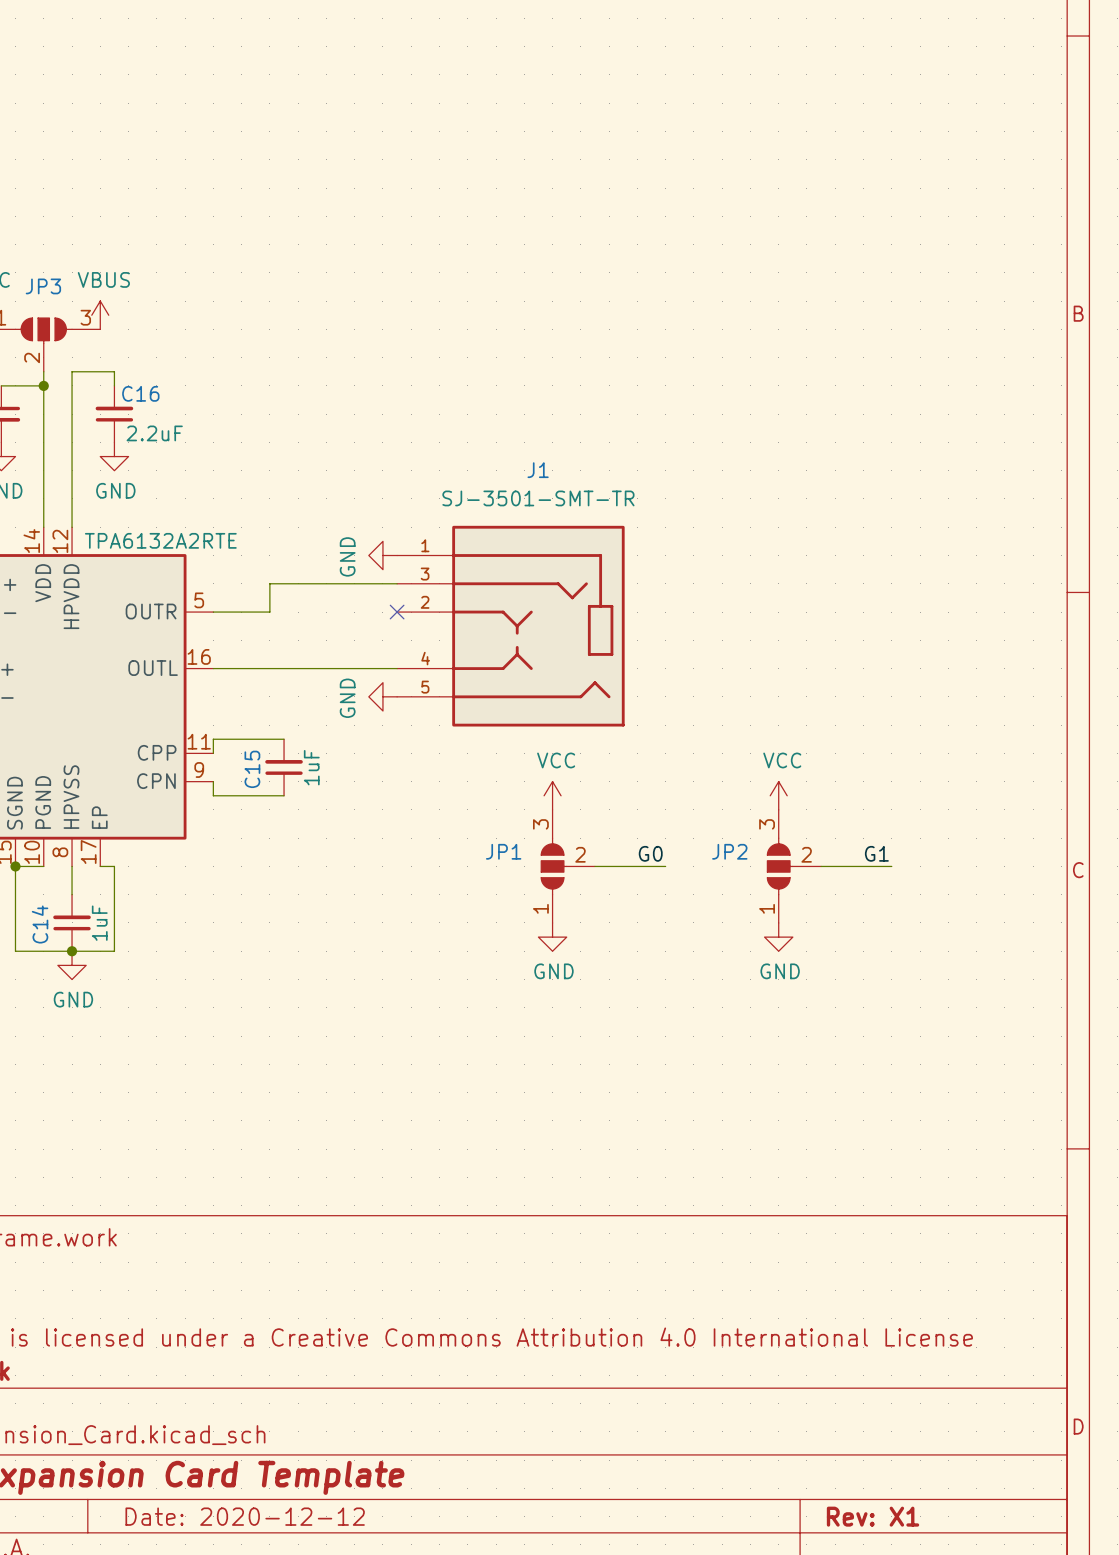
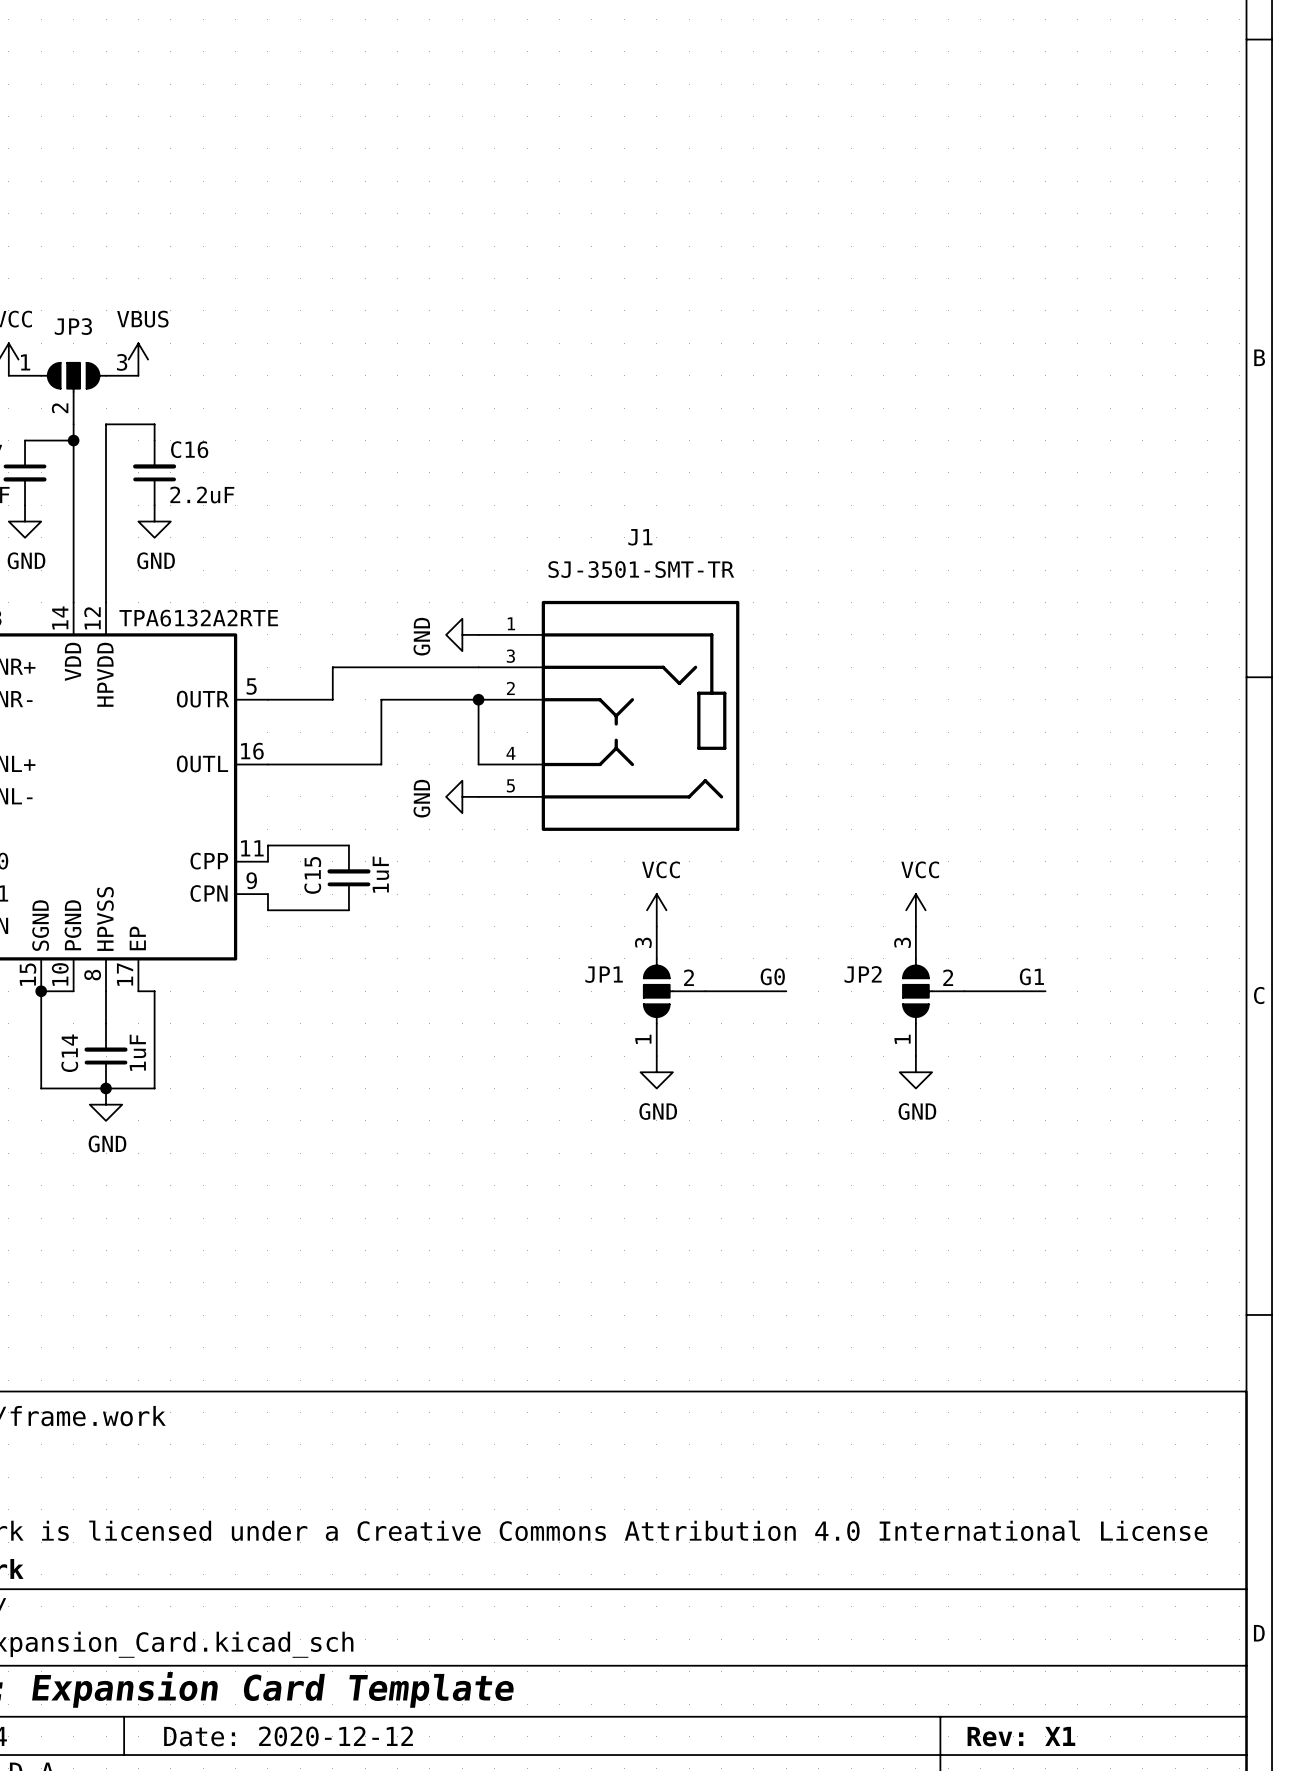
no-connect mark: (397, 612) -> none
junction: none -> (478, 699)
wire: (312, 668) (397, 668) -> (381, 764) (381, 699) (478, 699) (478, 764)

